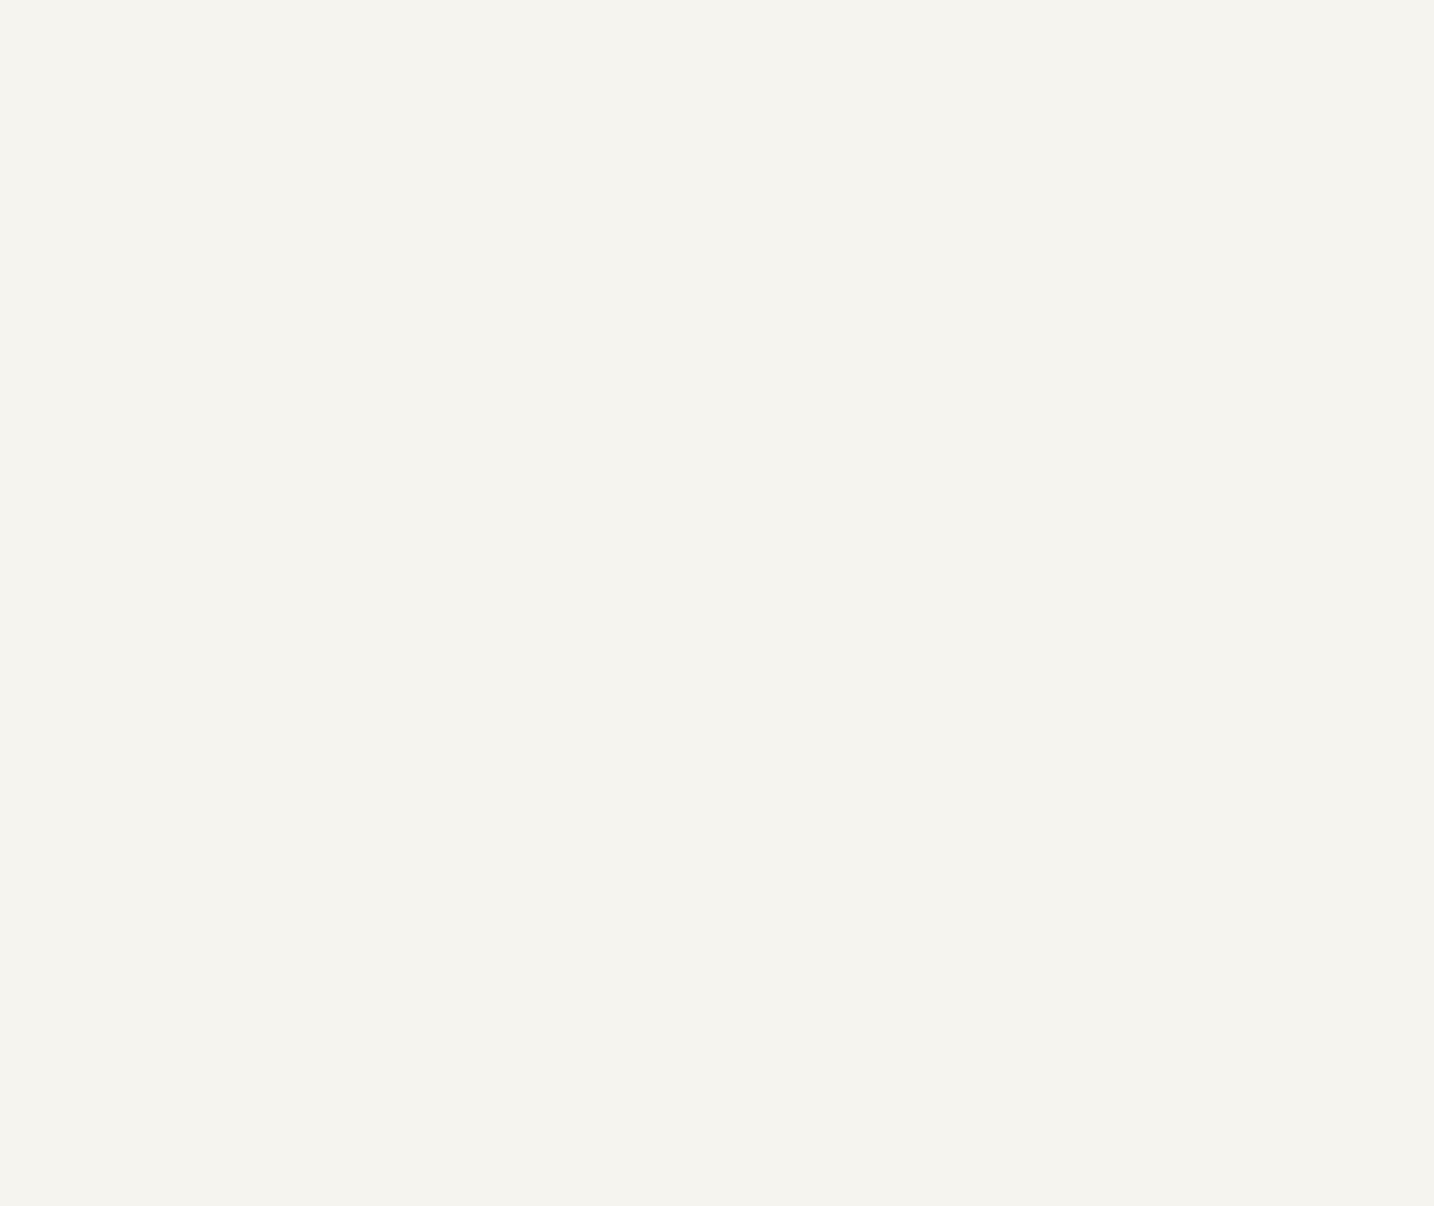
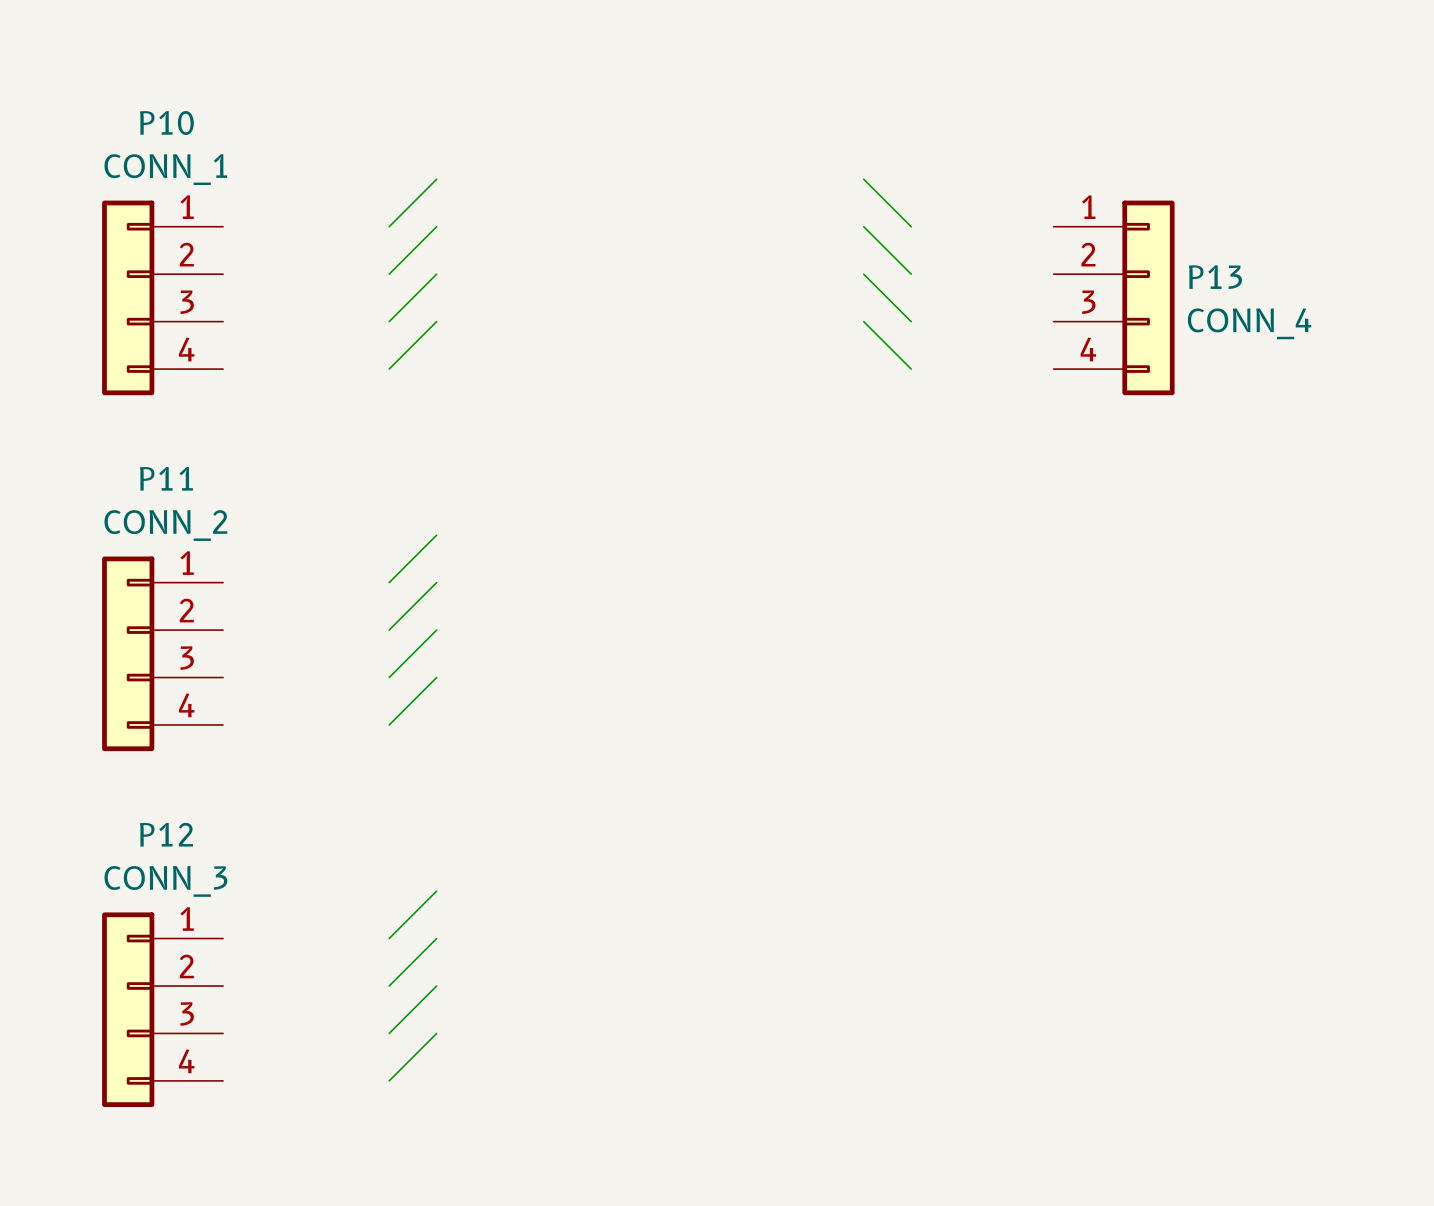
wire: none -> (436, 179) (389, 226)
wire: none -> (863, 179) (911, 226)
wire: none -> (436, 226) (389, 274)
wire: none -> (863, 226) (911, 274)
wire: none -> (436, 274) (389, 321)
wire: none -> (863, 274) (911, 321)
P10: none -> CONN_1 (162, 297)
P13: none -> CONN_4 (1114, 297)
wire: none -> (436, 321) (389, 369)
wire: none -> (863, 321) (911, 369)
wire: none -> (436, 535) (389, 582)
wire: none -> (436, 582) (389, 630)
wire: none -> (436, 630) (389, 677)
P11: none -> CONN_2 (162, 653)
wire: none -> (436, 677) (389, 724)
wire: none -> (436, 891) (389, 938)
wire: none -> (436, 938) (389, 985)
wire: none -> (436, 985) (389, 1033)
P12: none -> CONN_3 (162, 1009)
wire: none -> (436, 1033) (389, 1080)

